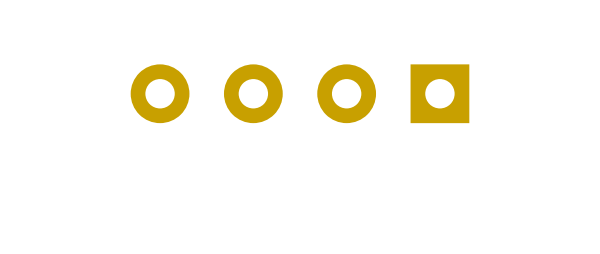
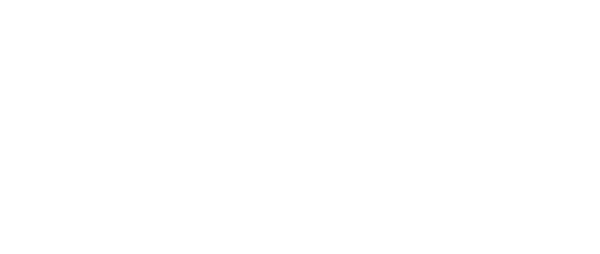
part: (300, 93) -> none

